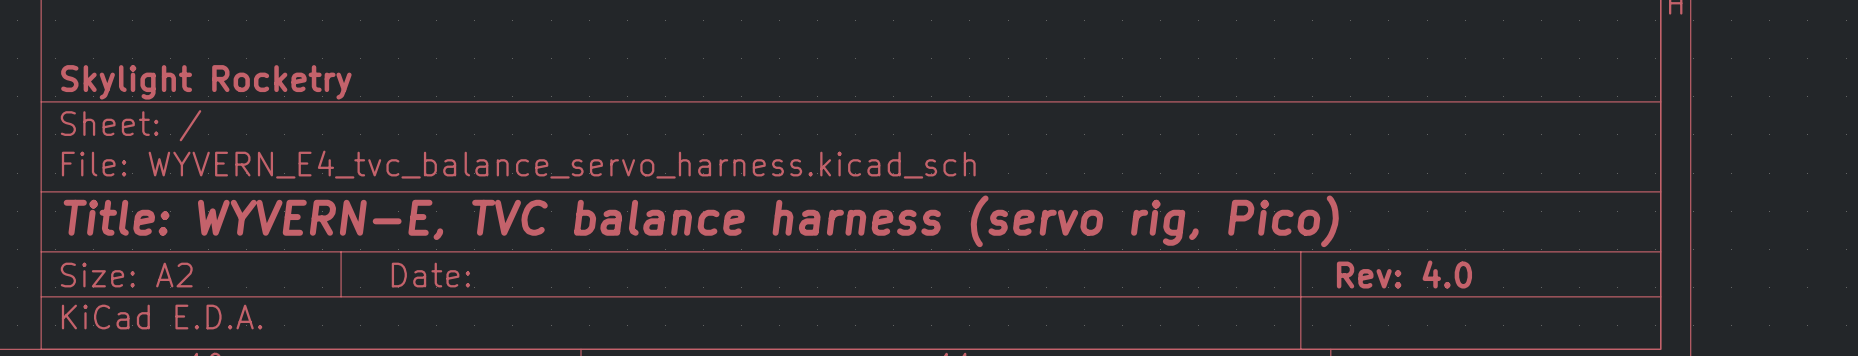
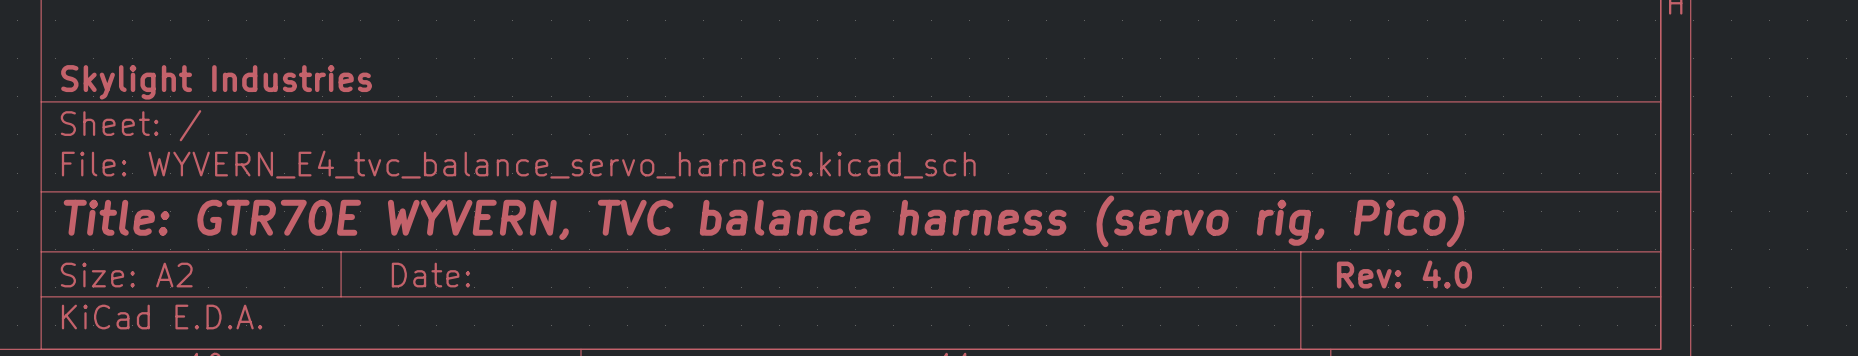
title block: Skylight Rocketry (206, 82) -> Skylight Industries (216, 82)
title block: Title: WYVERN-E, TVC balance harness (servo rig, Pico) (701, 221) -> Title: GTR70E WYVERN, TVC balance harness (servo rig, Pico) (764, 221)

